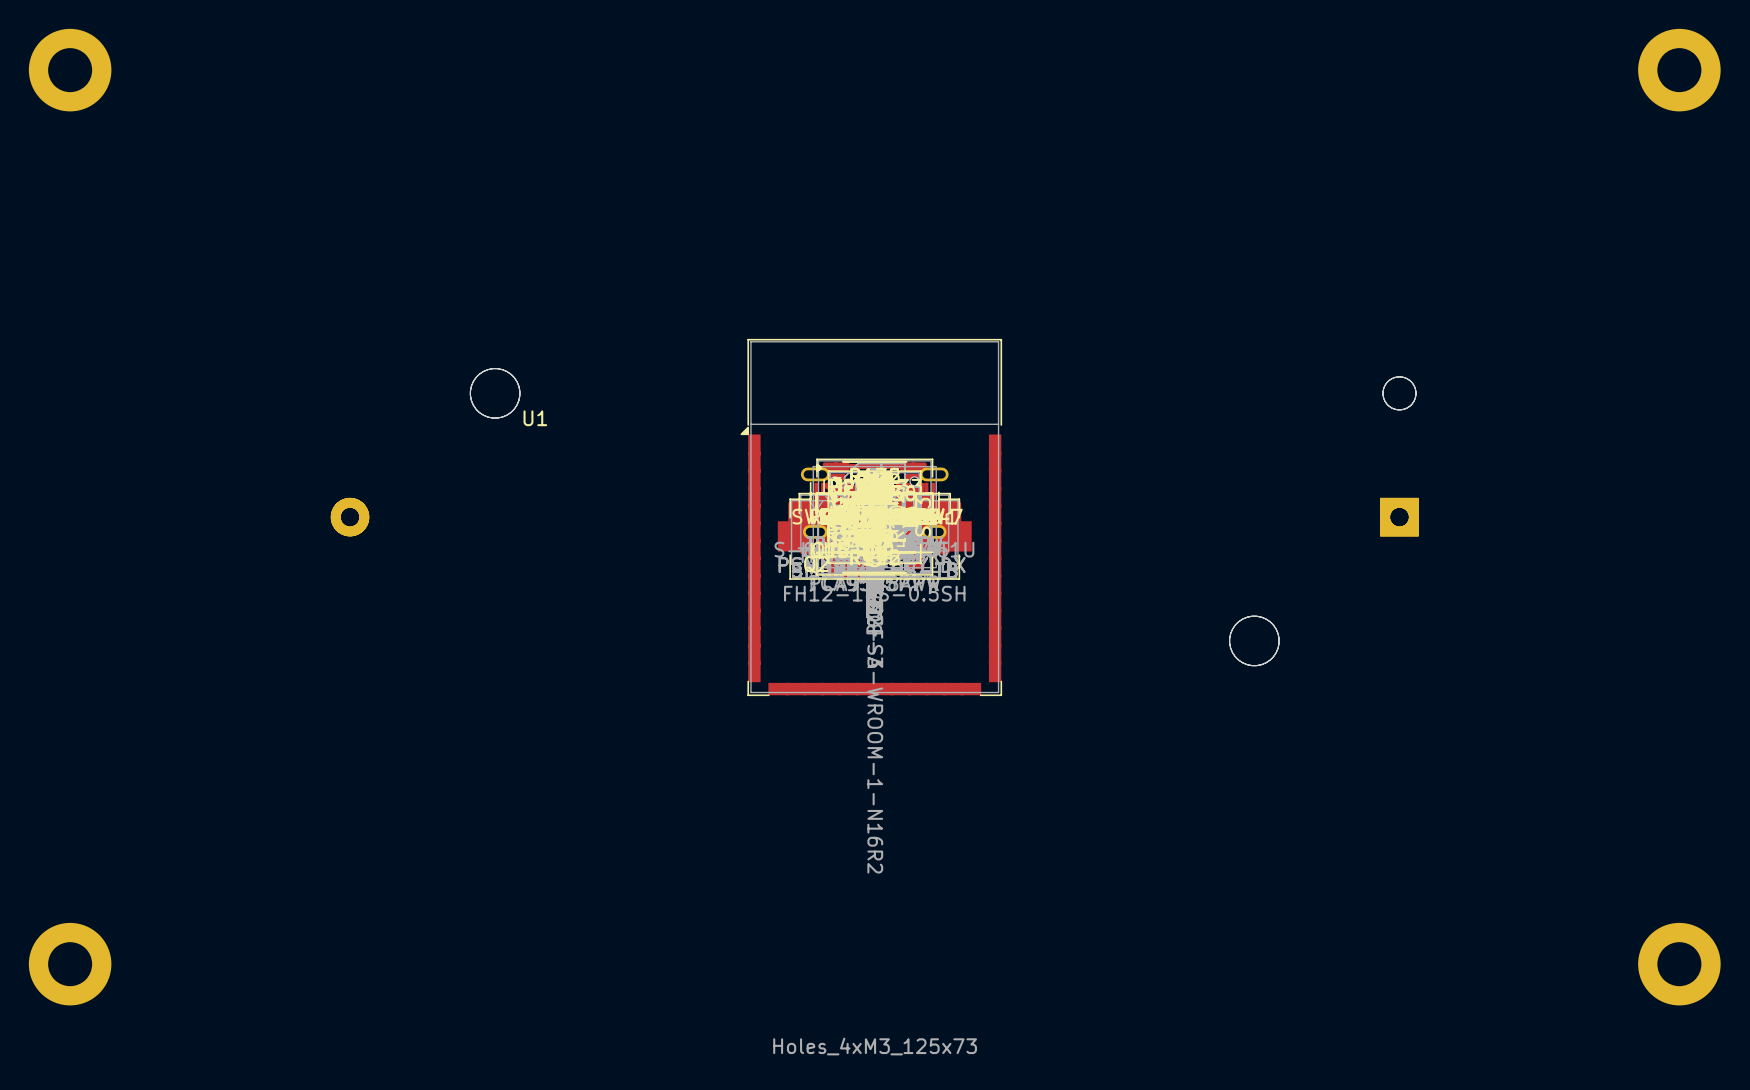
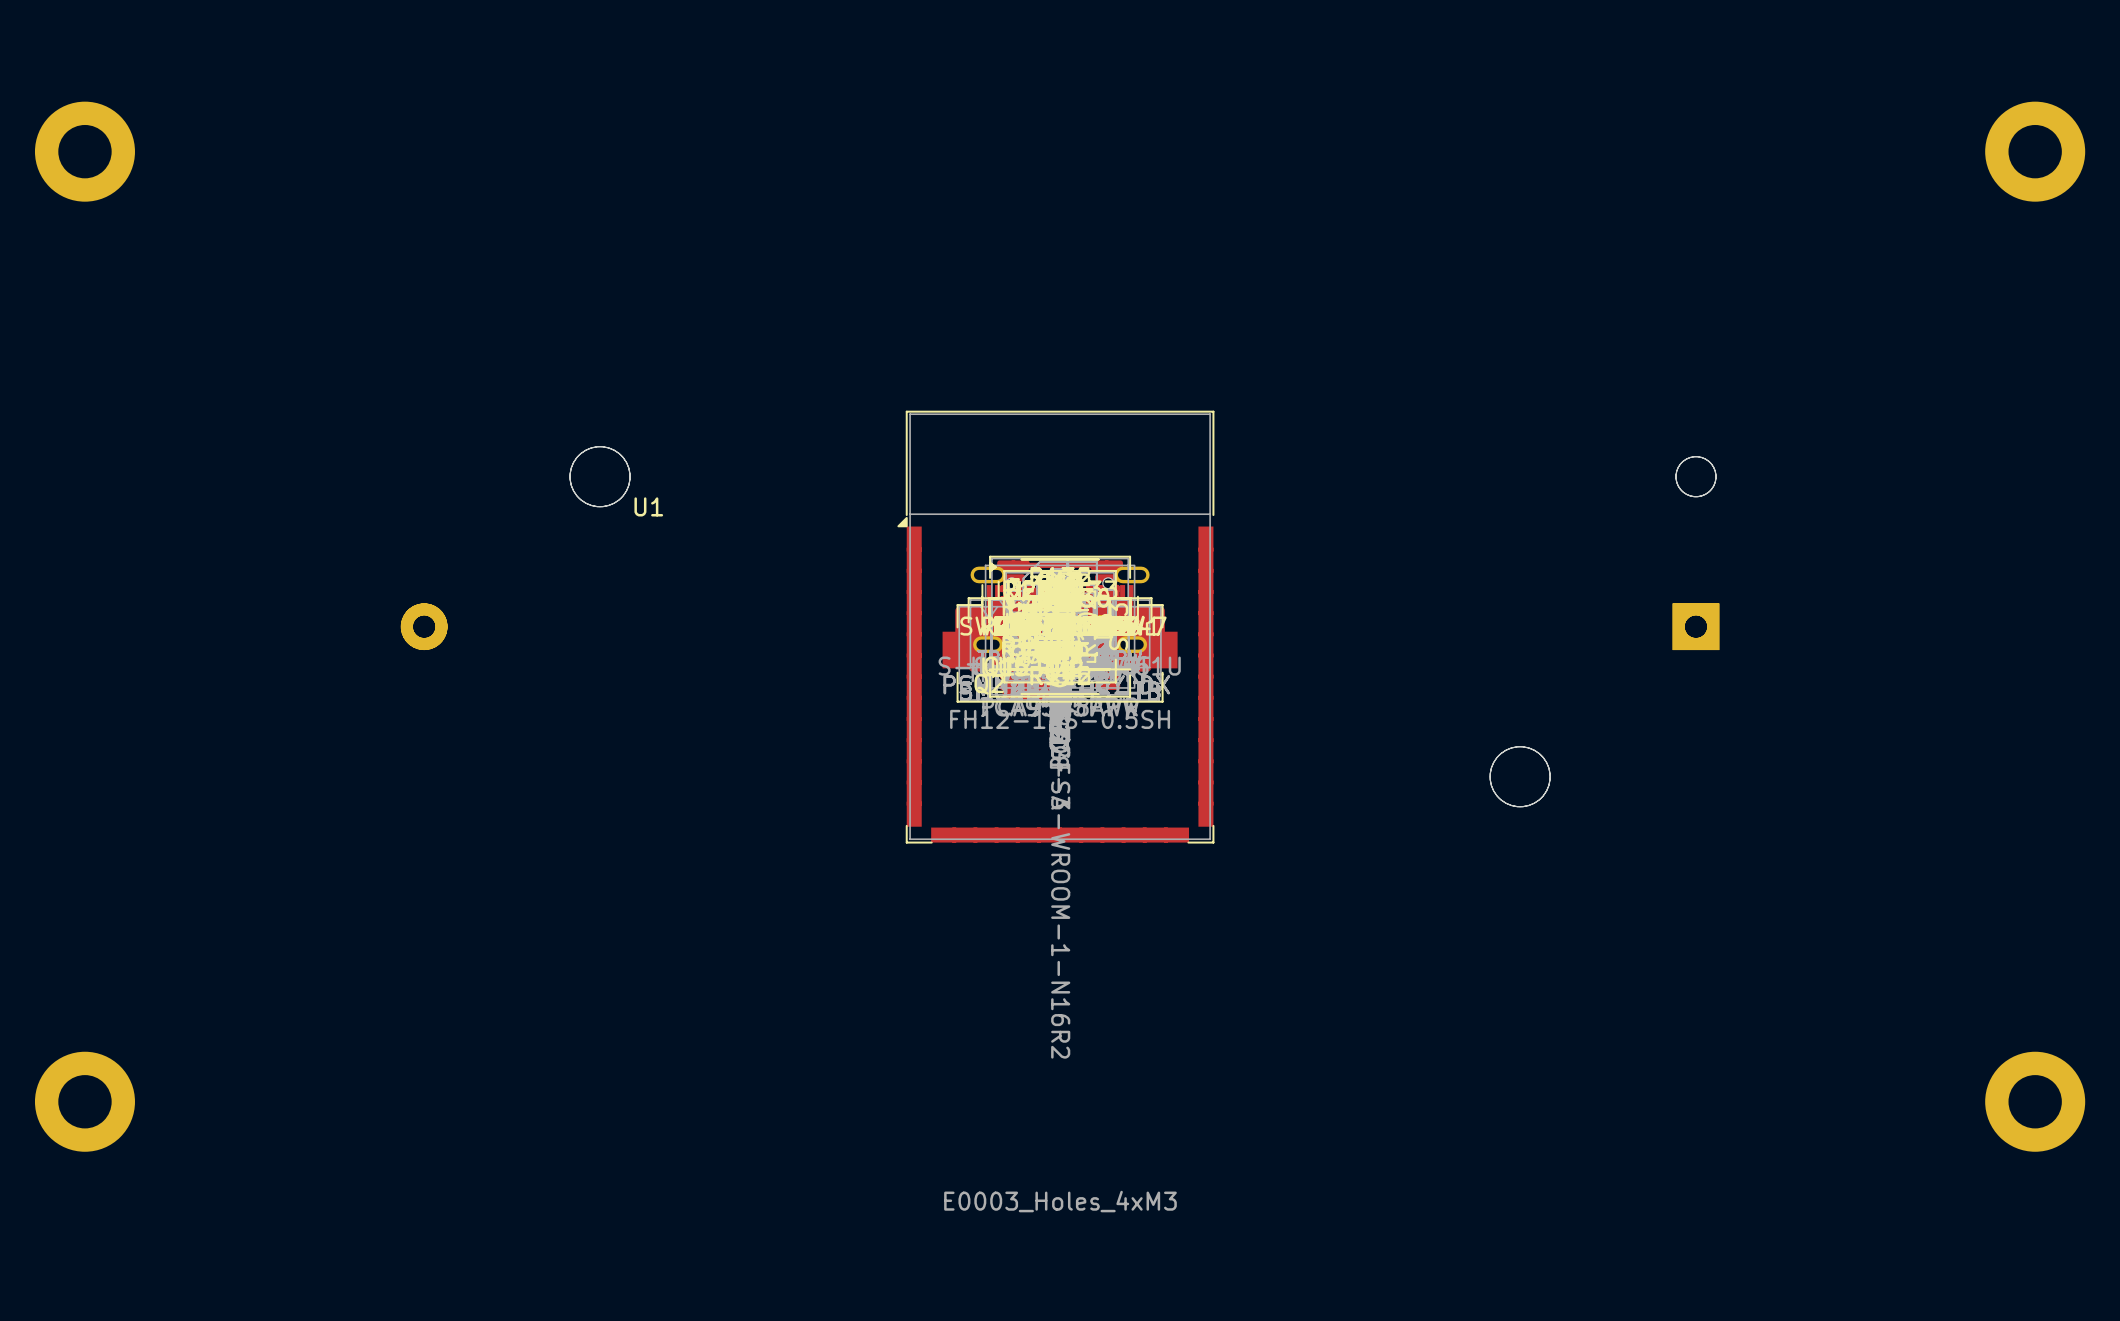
part footprint: [28, 28, 1721, 1006] -> [34, 101, 2086, 1152]
part value: Holes_4xM3_125x73 (875, 1046) -> E0003_Holes_4xM3 (1060, 1201)

